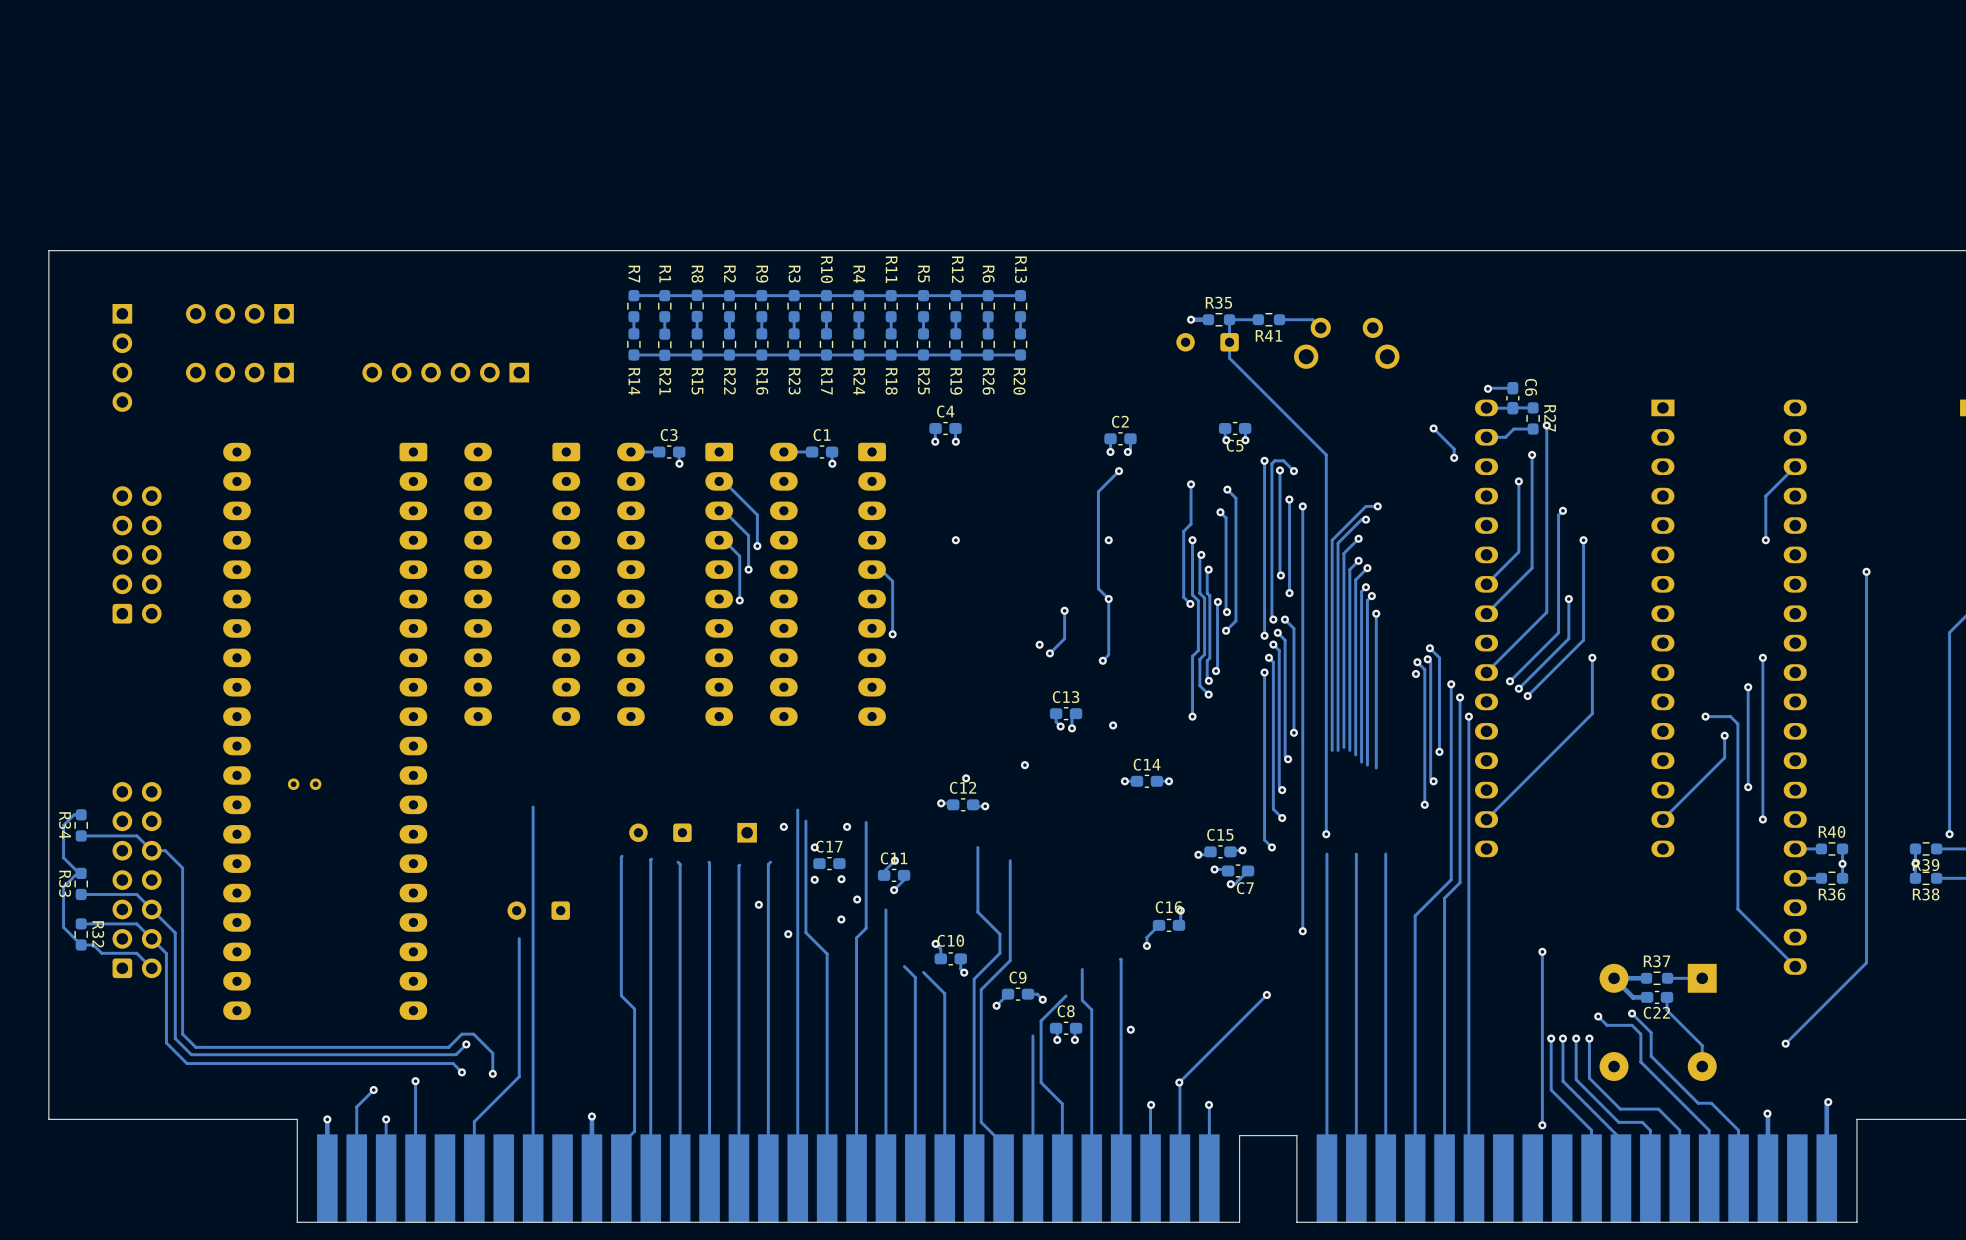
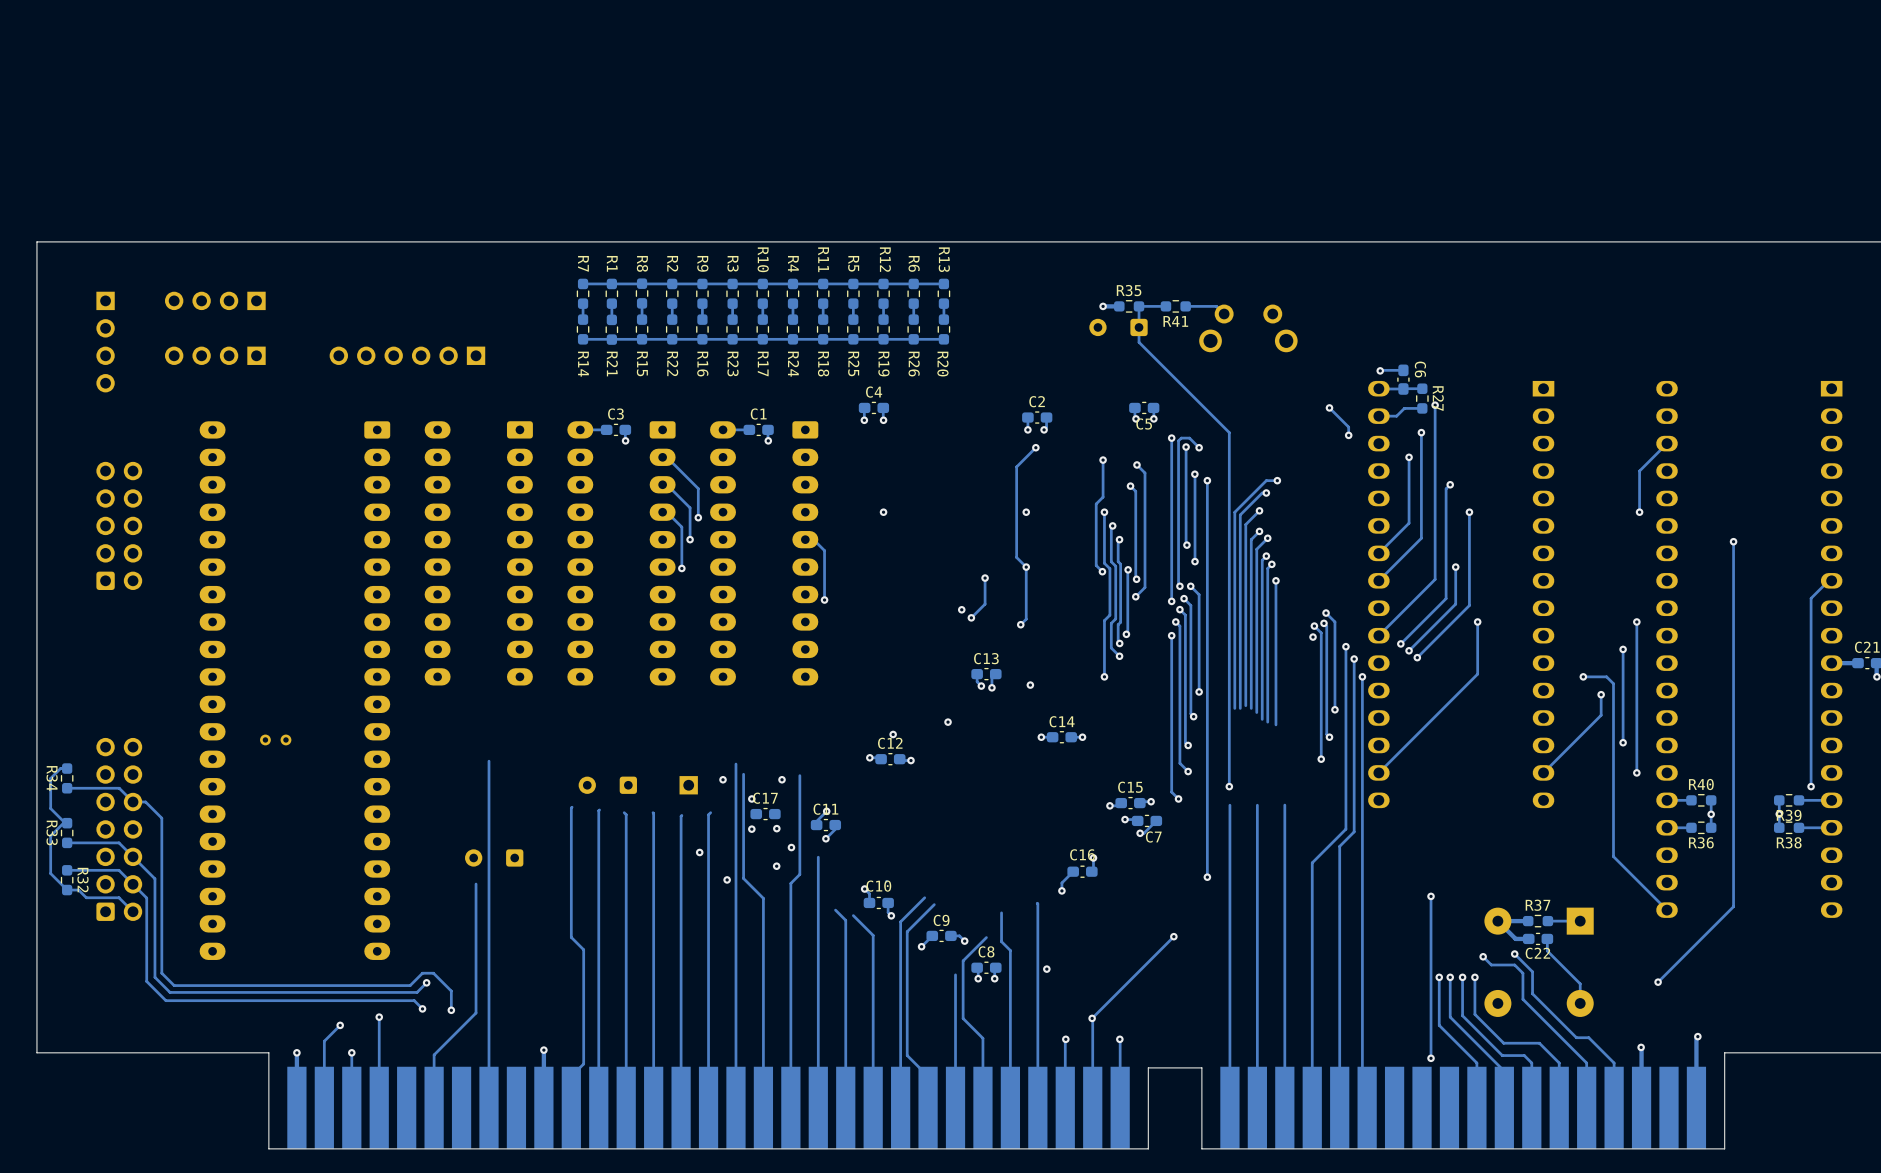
track: (977, 847) (977, 912) (999, 934) (999, 953) -> none
track: (1010, 860) (1010, 960) -> none

